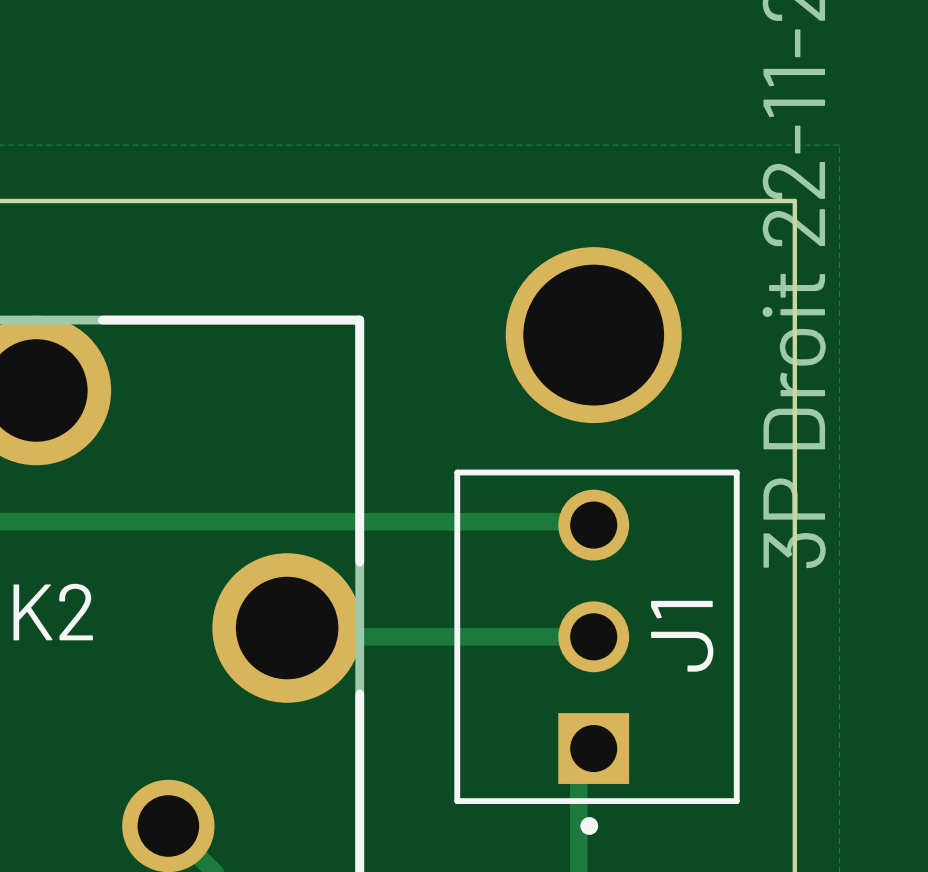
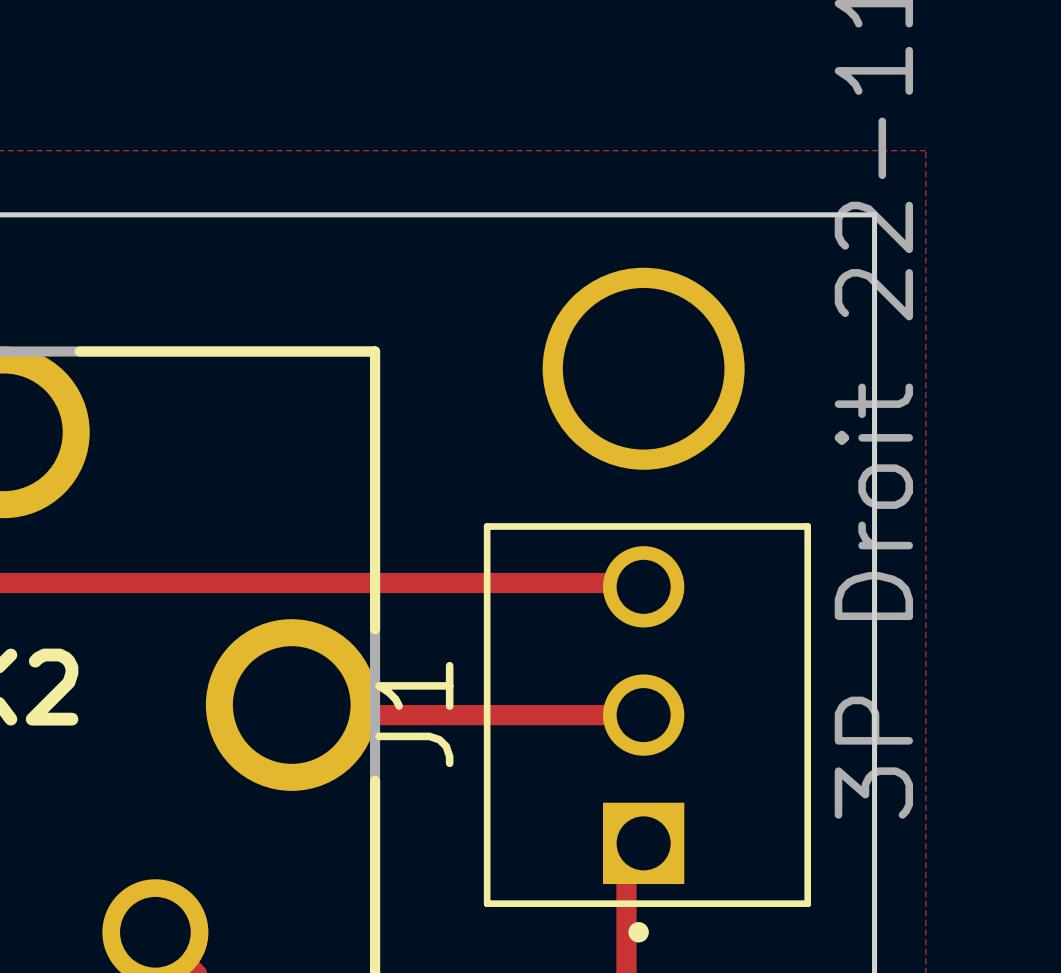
J1 name position: J1 (682, 636) -> J1 (414, 714)

